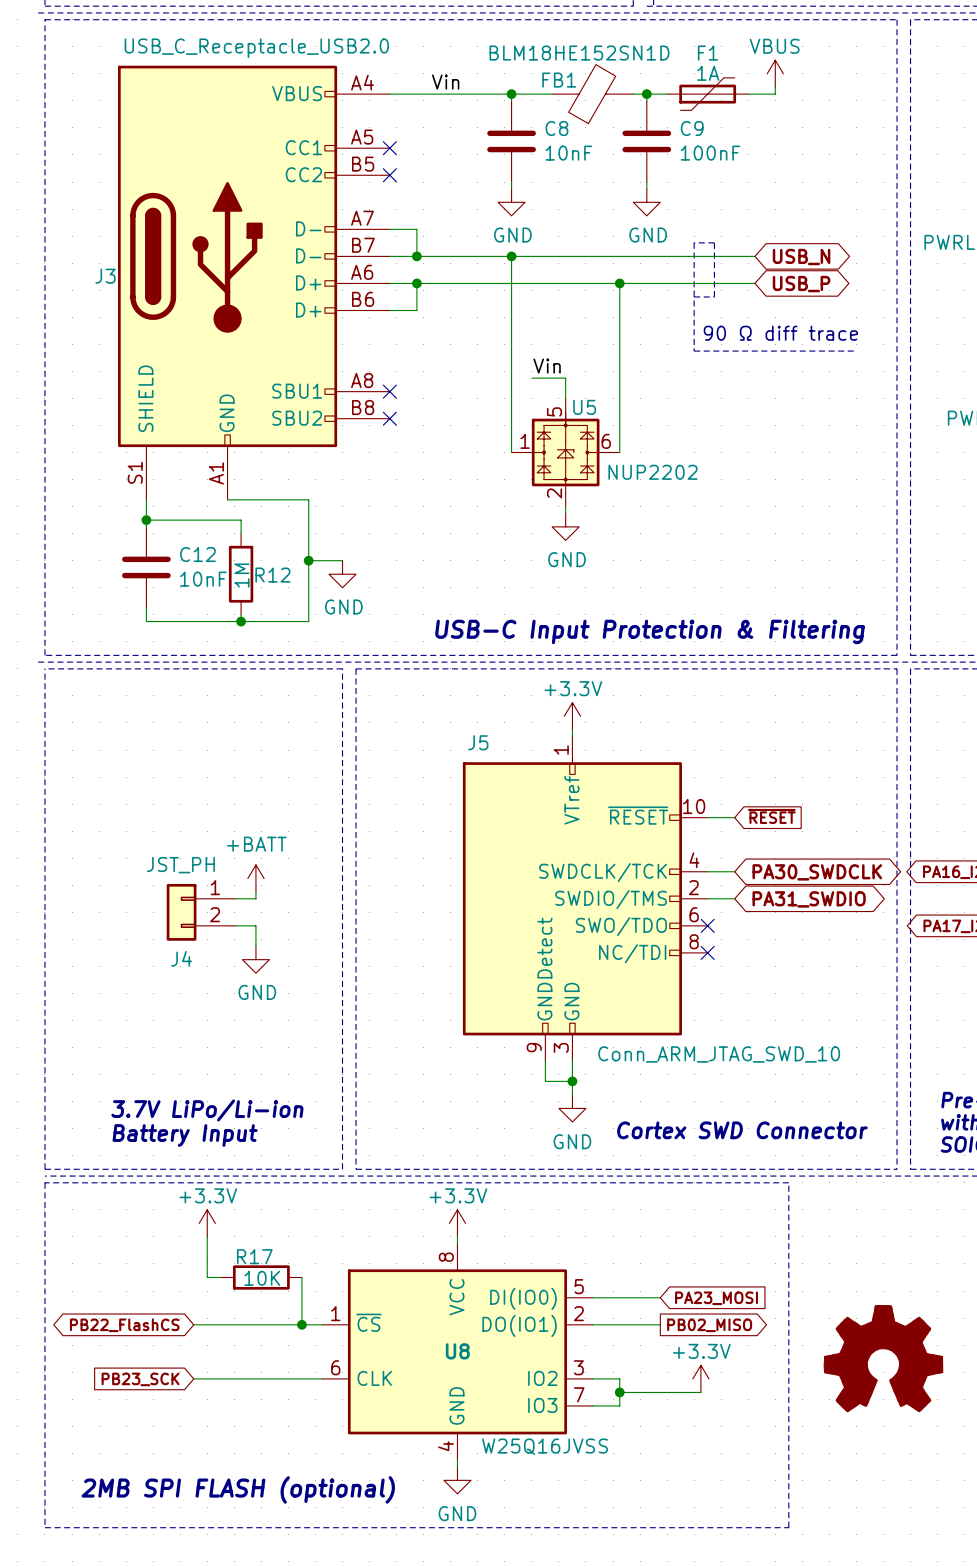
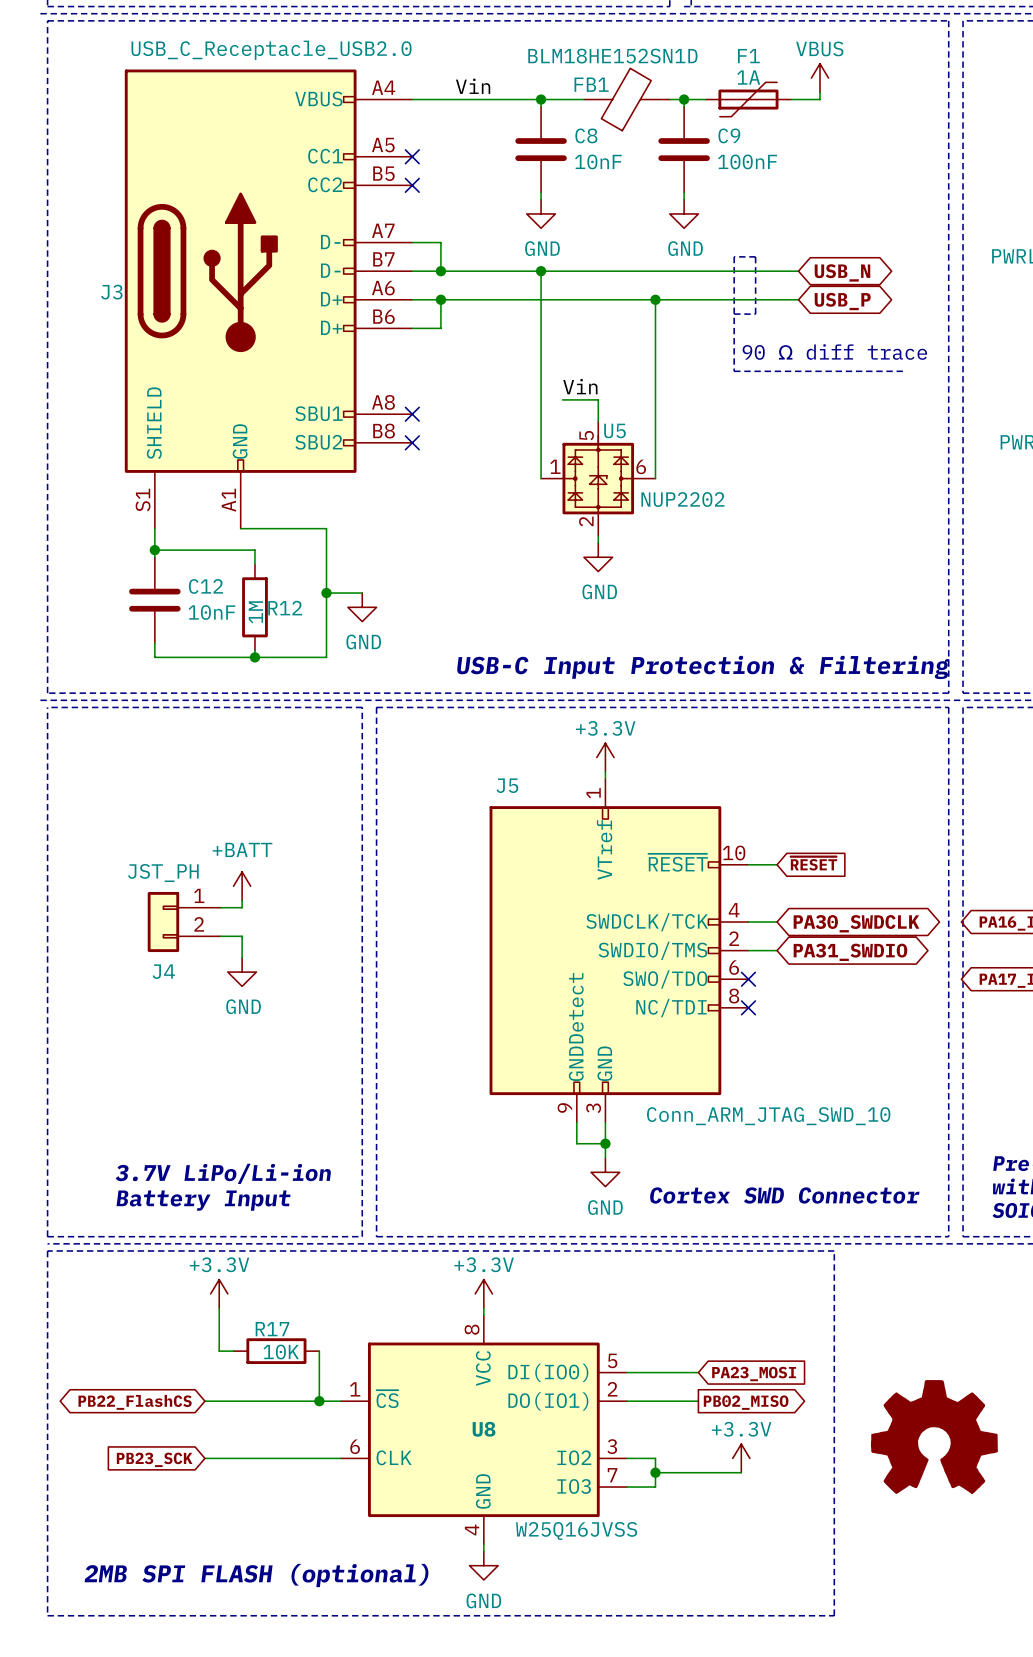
power symbol position: +BATT (255, 878) -> +BATT (242, 886)
wire: (255, 892) (255, 898) (235, 898) -> (242, 900) (242, 907) (220, 907)
J4 position: (201, 912) -> (184, 922)
wire: (235, 925) (255, 925) (255, 946) -> (220, 936) (242, 936) (242, 957)
power symbol position: GND (255, 959) -> GND (242, 972)

